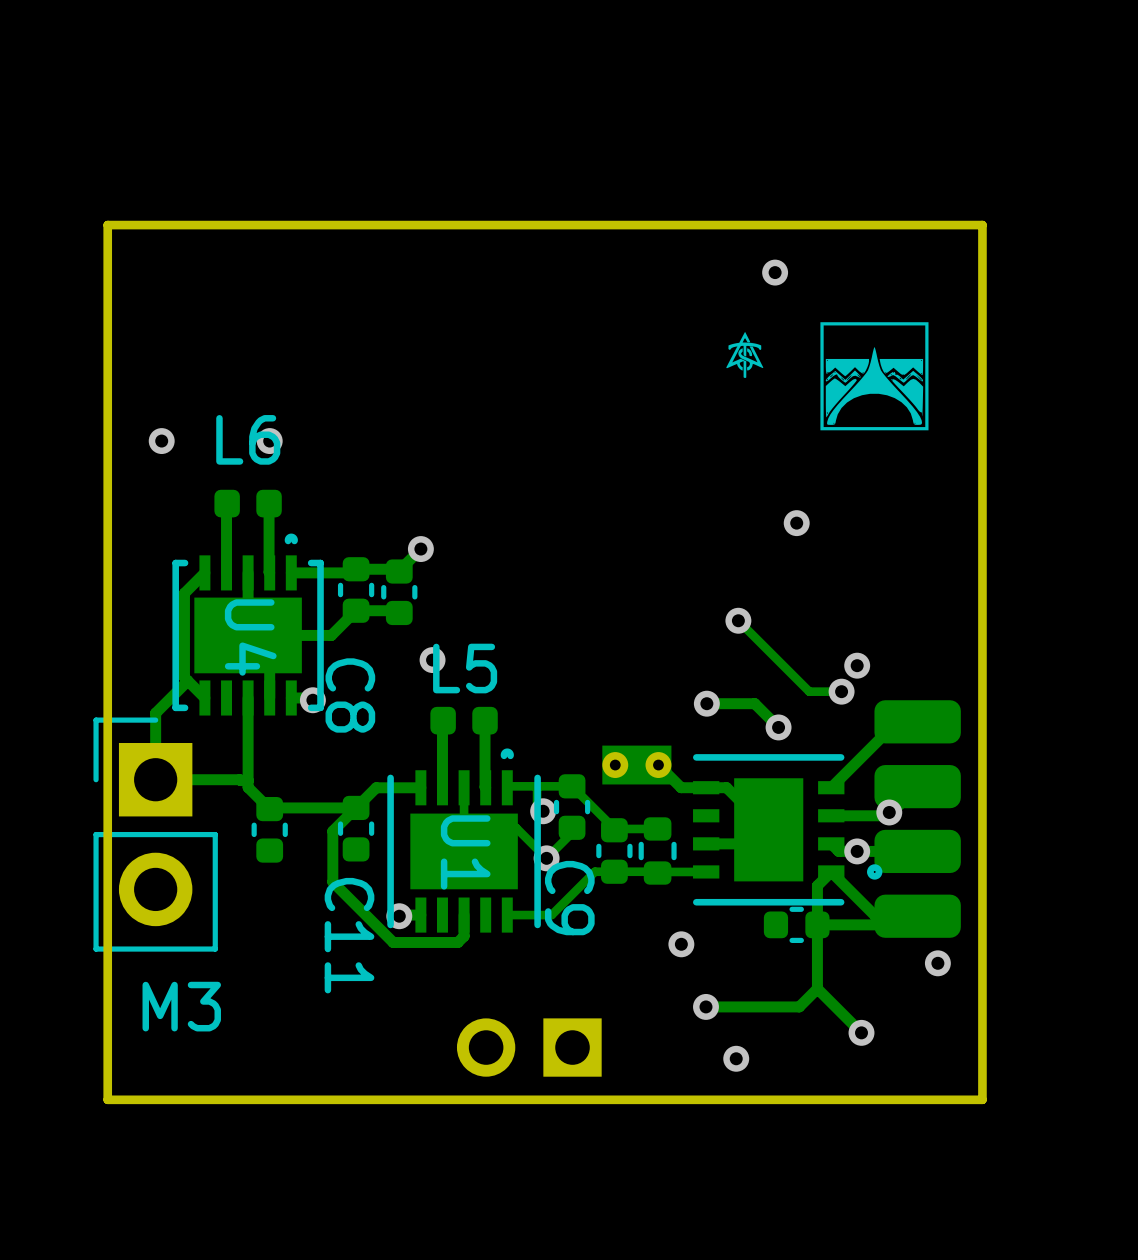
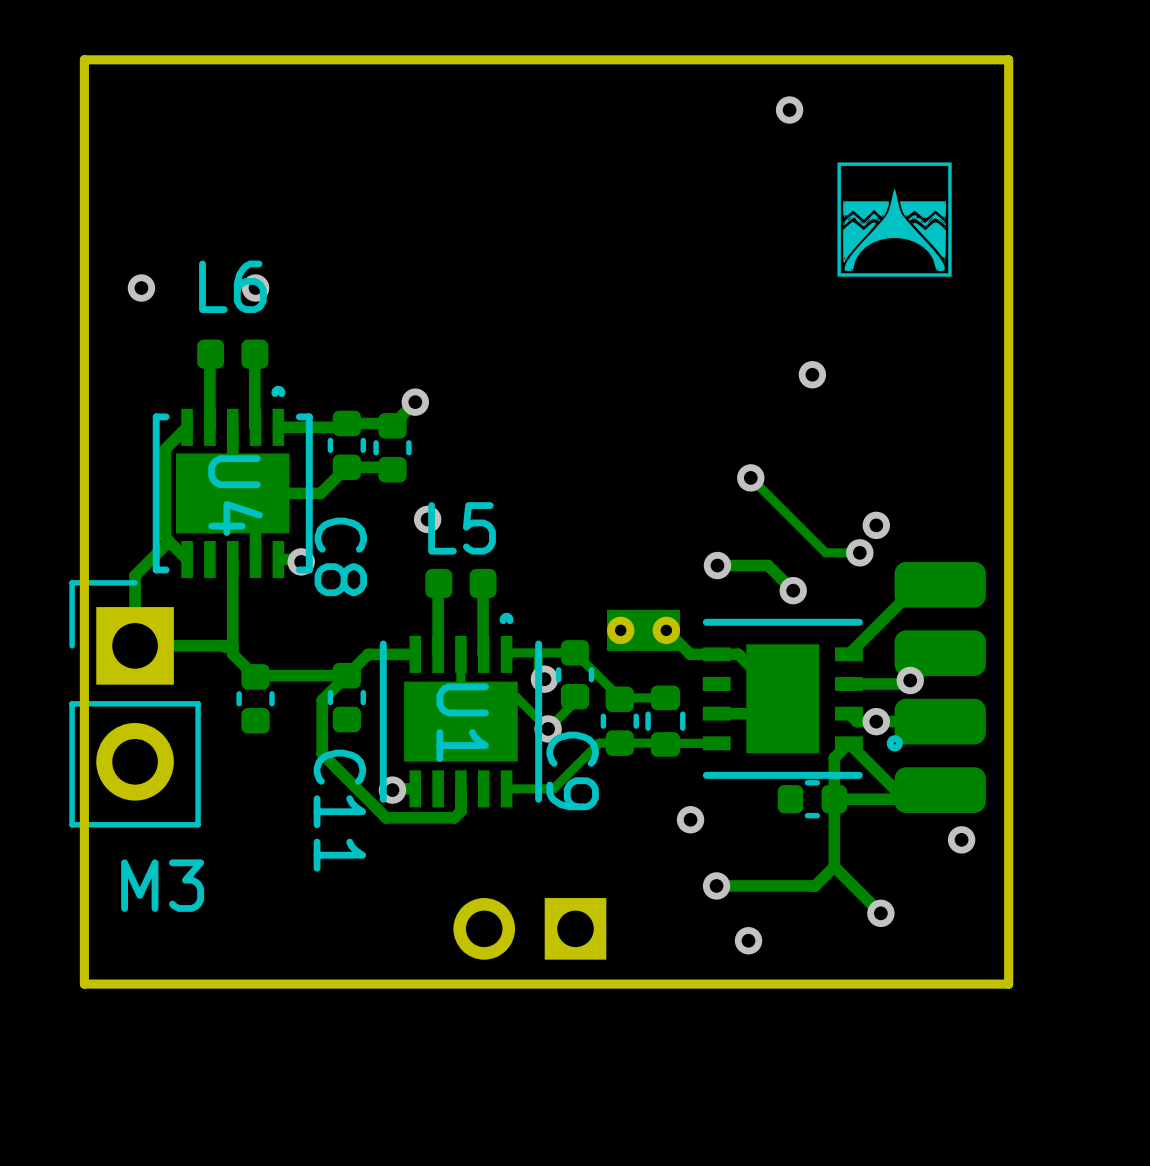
drawing: [726, 331, 764, 378] -> none

